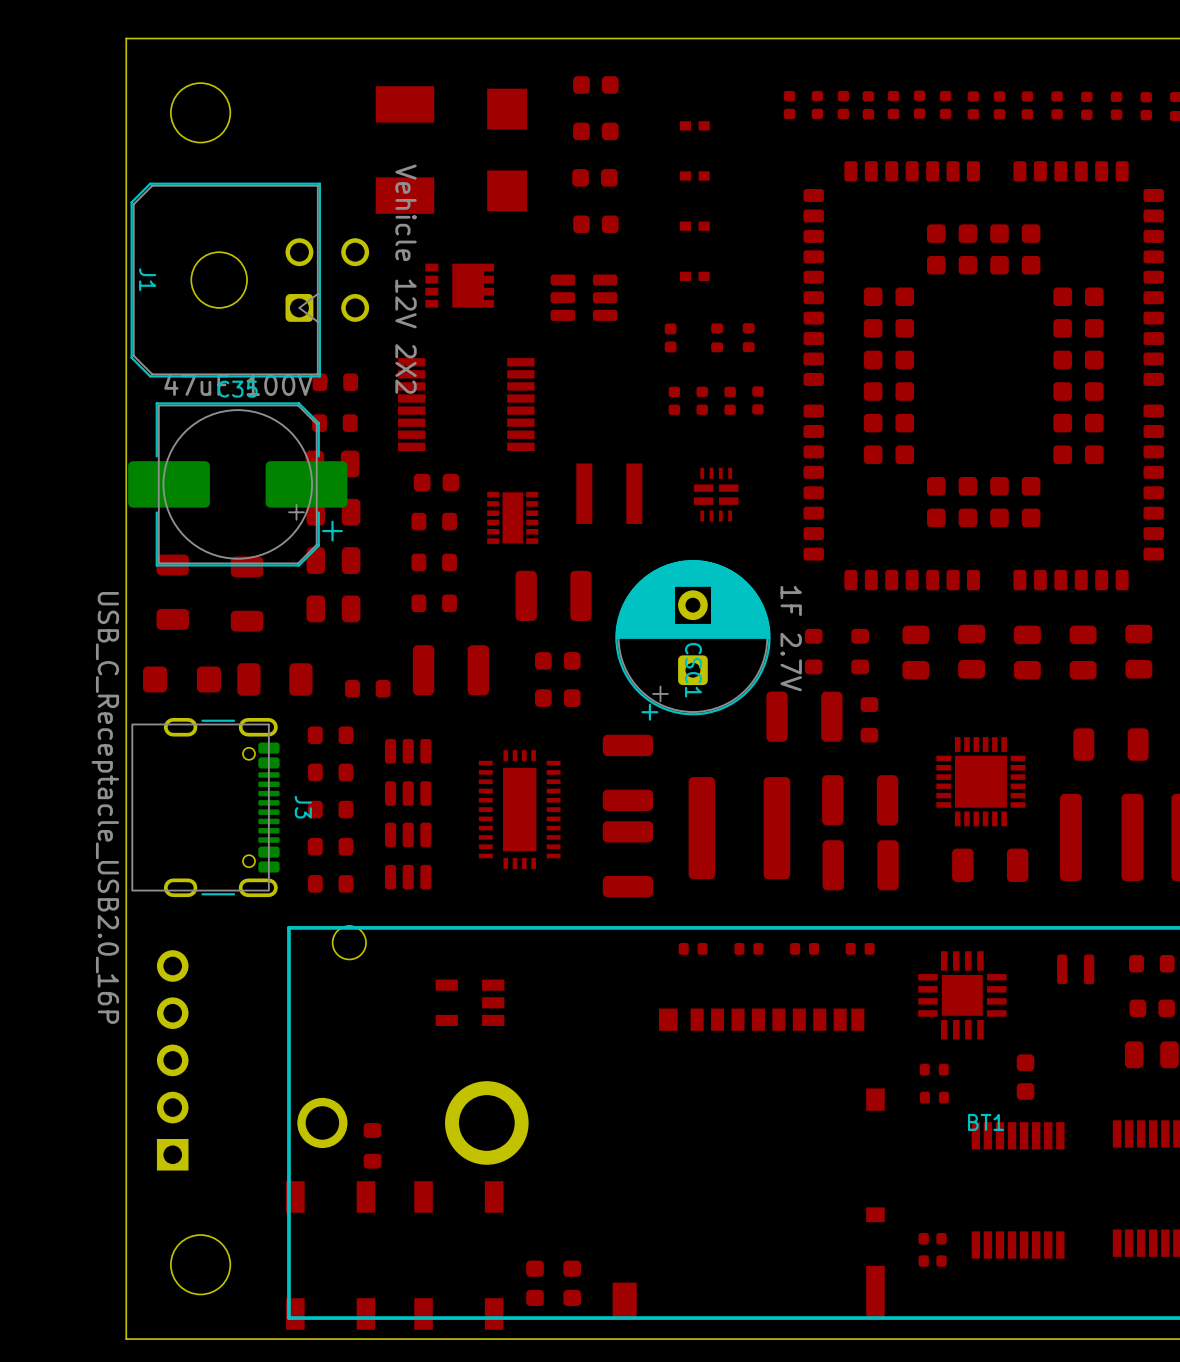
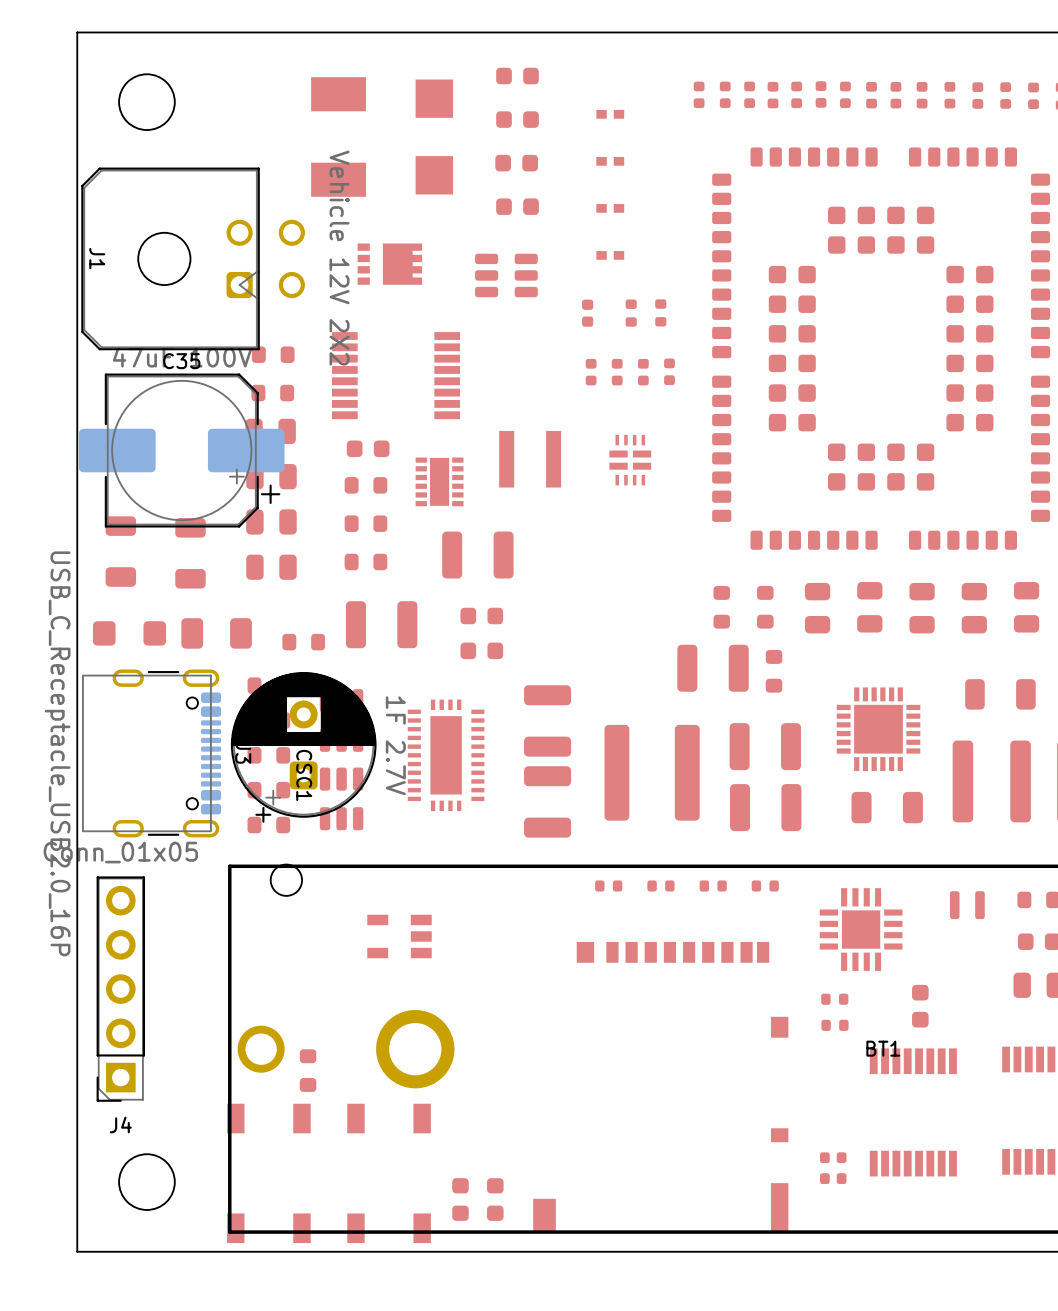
CSC1 position: (692, 640) -> (303, 747)
J4 side: top (172, 1060) -> bottom (120, 989)

